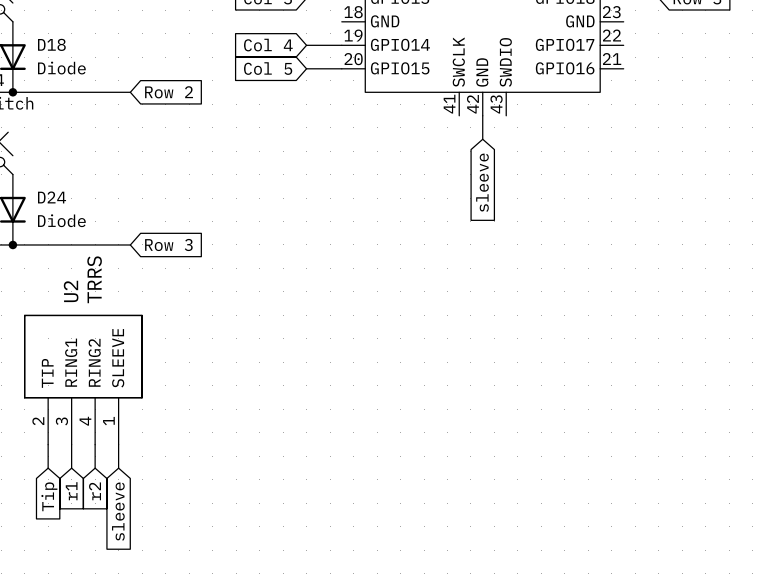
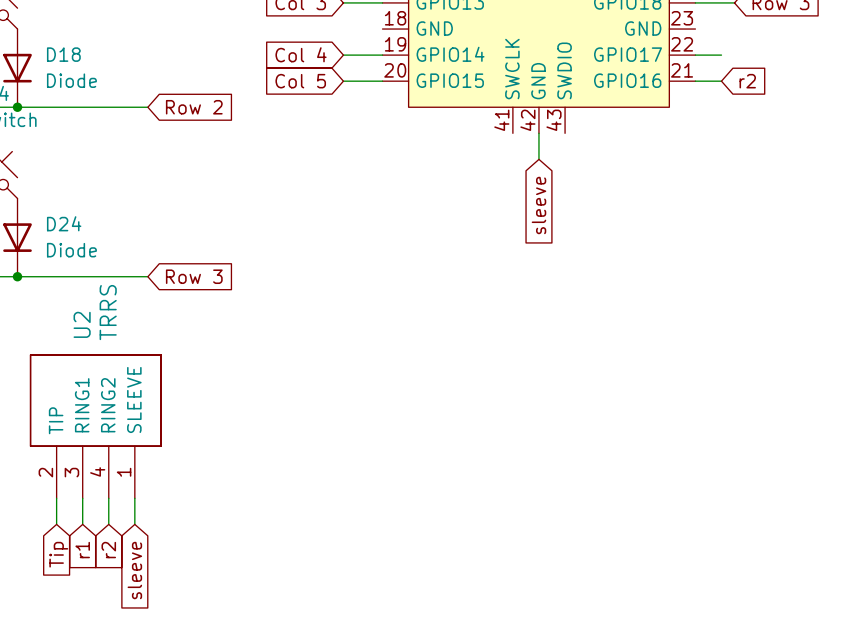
wire: none -> (695, 55) (721, 55)
wire: none -> (695, 81) (721, 81)
global label: none -> r2 (747, 81)

